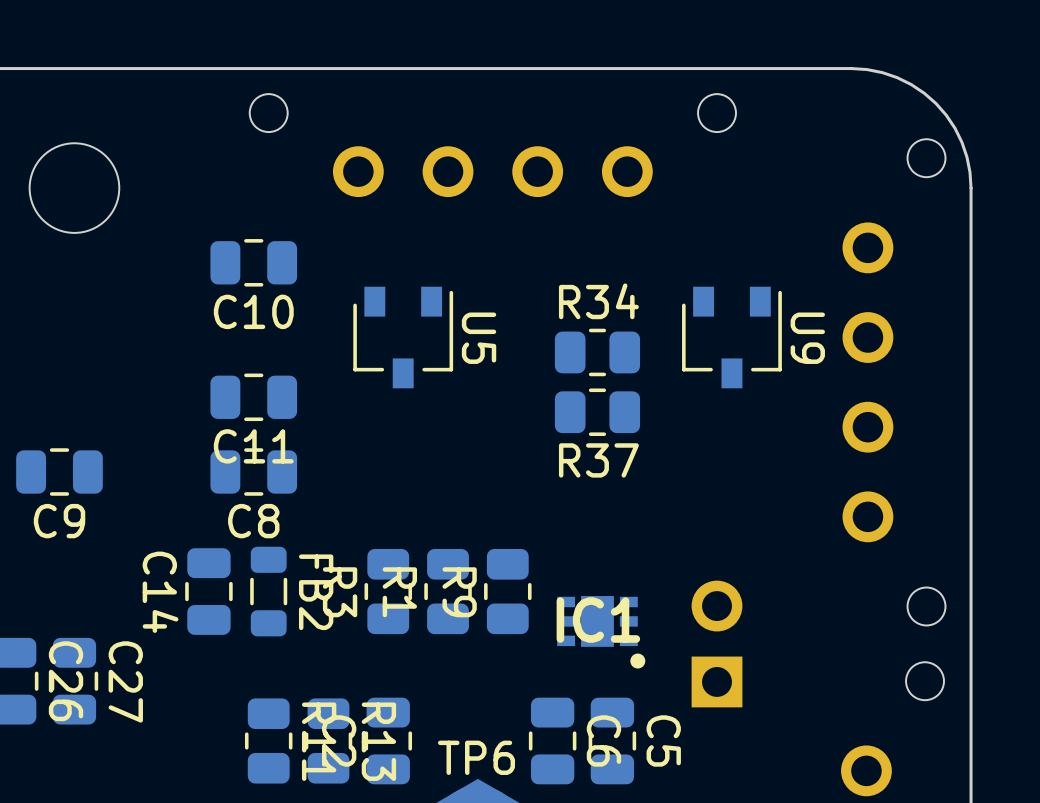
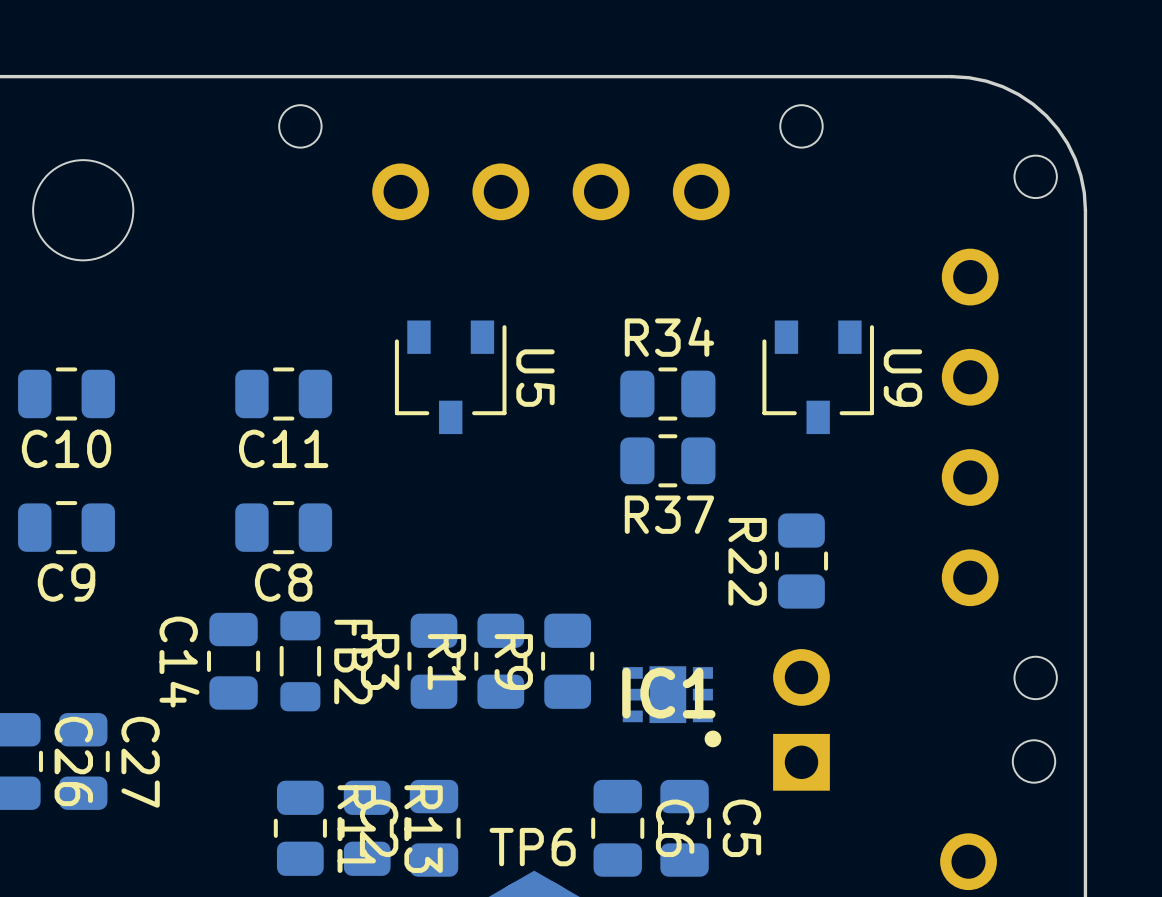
C10 position: (253, 262) -> (66, 393)
C11 position: (253, 397) -> (283, 393)
R22: none -> (801, 561)

